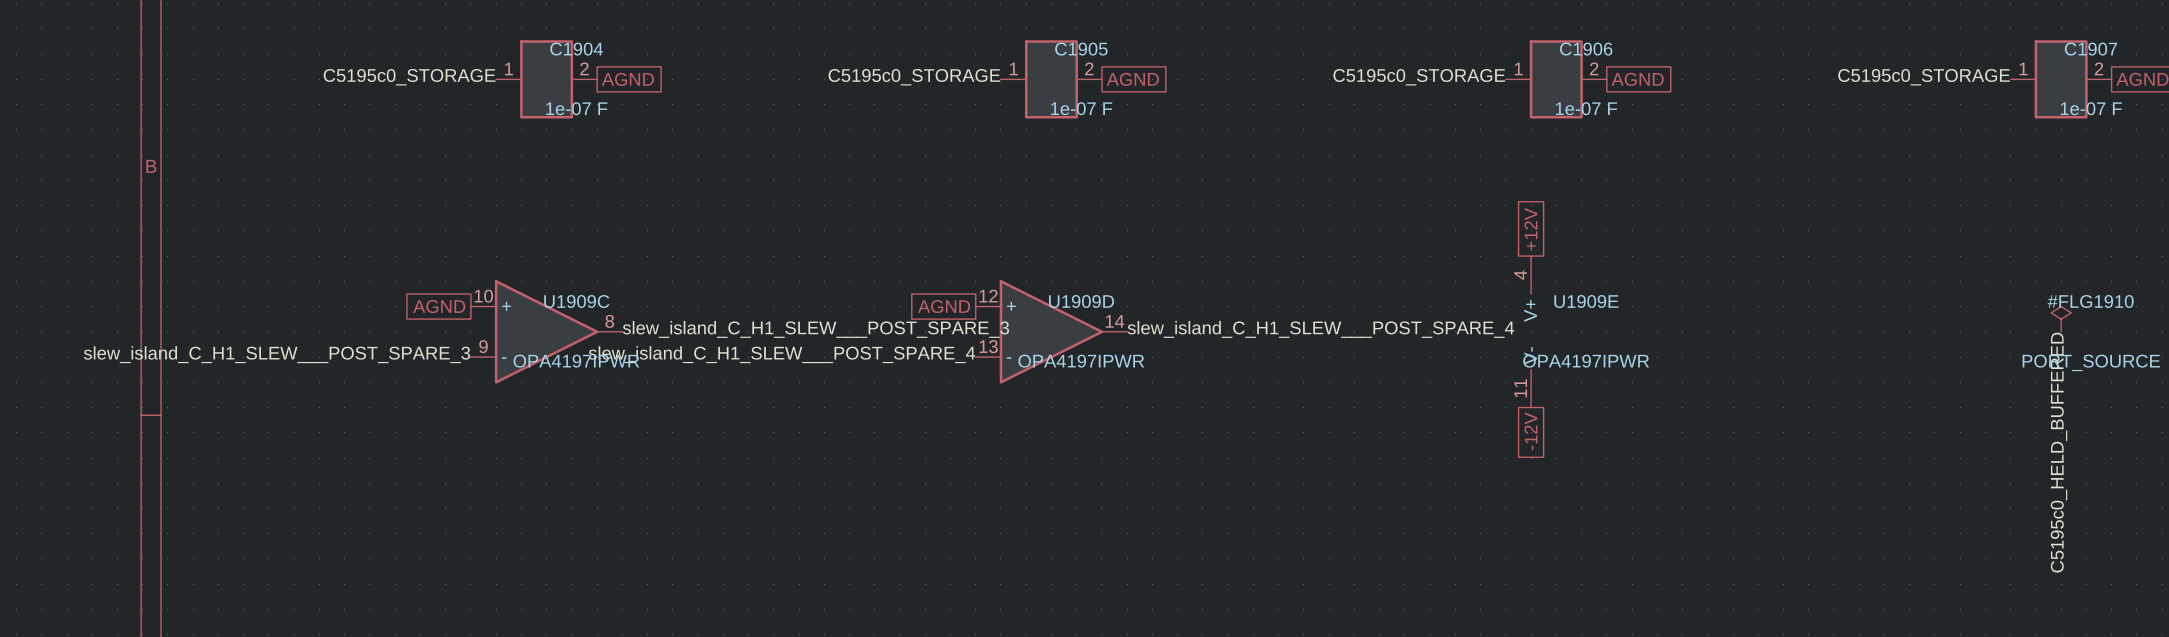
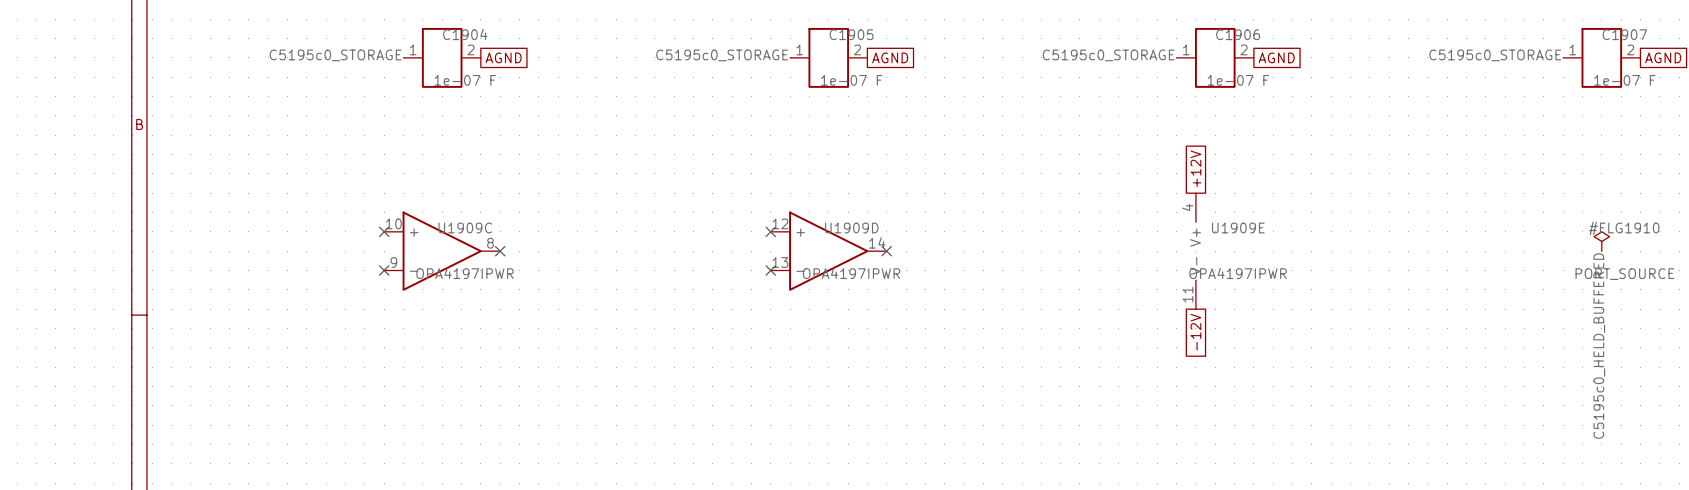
global label: AGND (439, 306) -> none
no-connect mark: none -> (384, 231)
global label: AGND (944, 306) -> none
no-connect mark: none -> (770, 231)
label: slew_island_C_H1_SLEW___POST_SPARE_3 (815, 329) -> none
label: slew_island_C_H1_SLEW___POST_SPARE_4 (1320, 329) -> none
no-connect mark: none -> (500, 251)
no-connect mark: none -> (886, 251)
label: slew_island_C_H1_SLEW___POST_SPARE_3 (277, 354) -> none
label: slew_island_C_H1_SLEW___POST_SPARE_4 (781, 354) -> none
no-connect mark: none -> (384, 270)
no-connect mark: none -> (770, 270)

